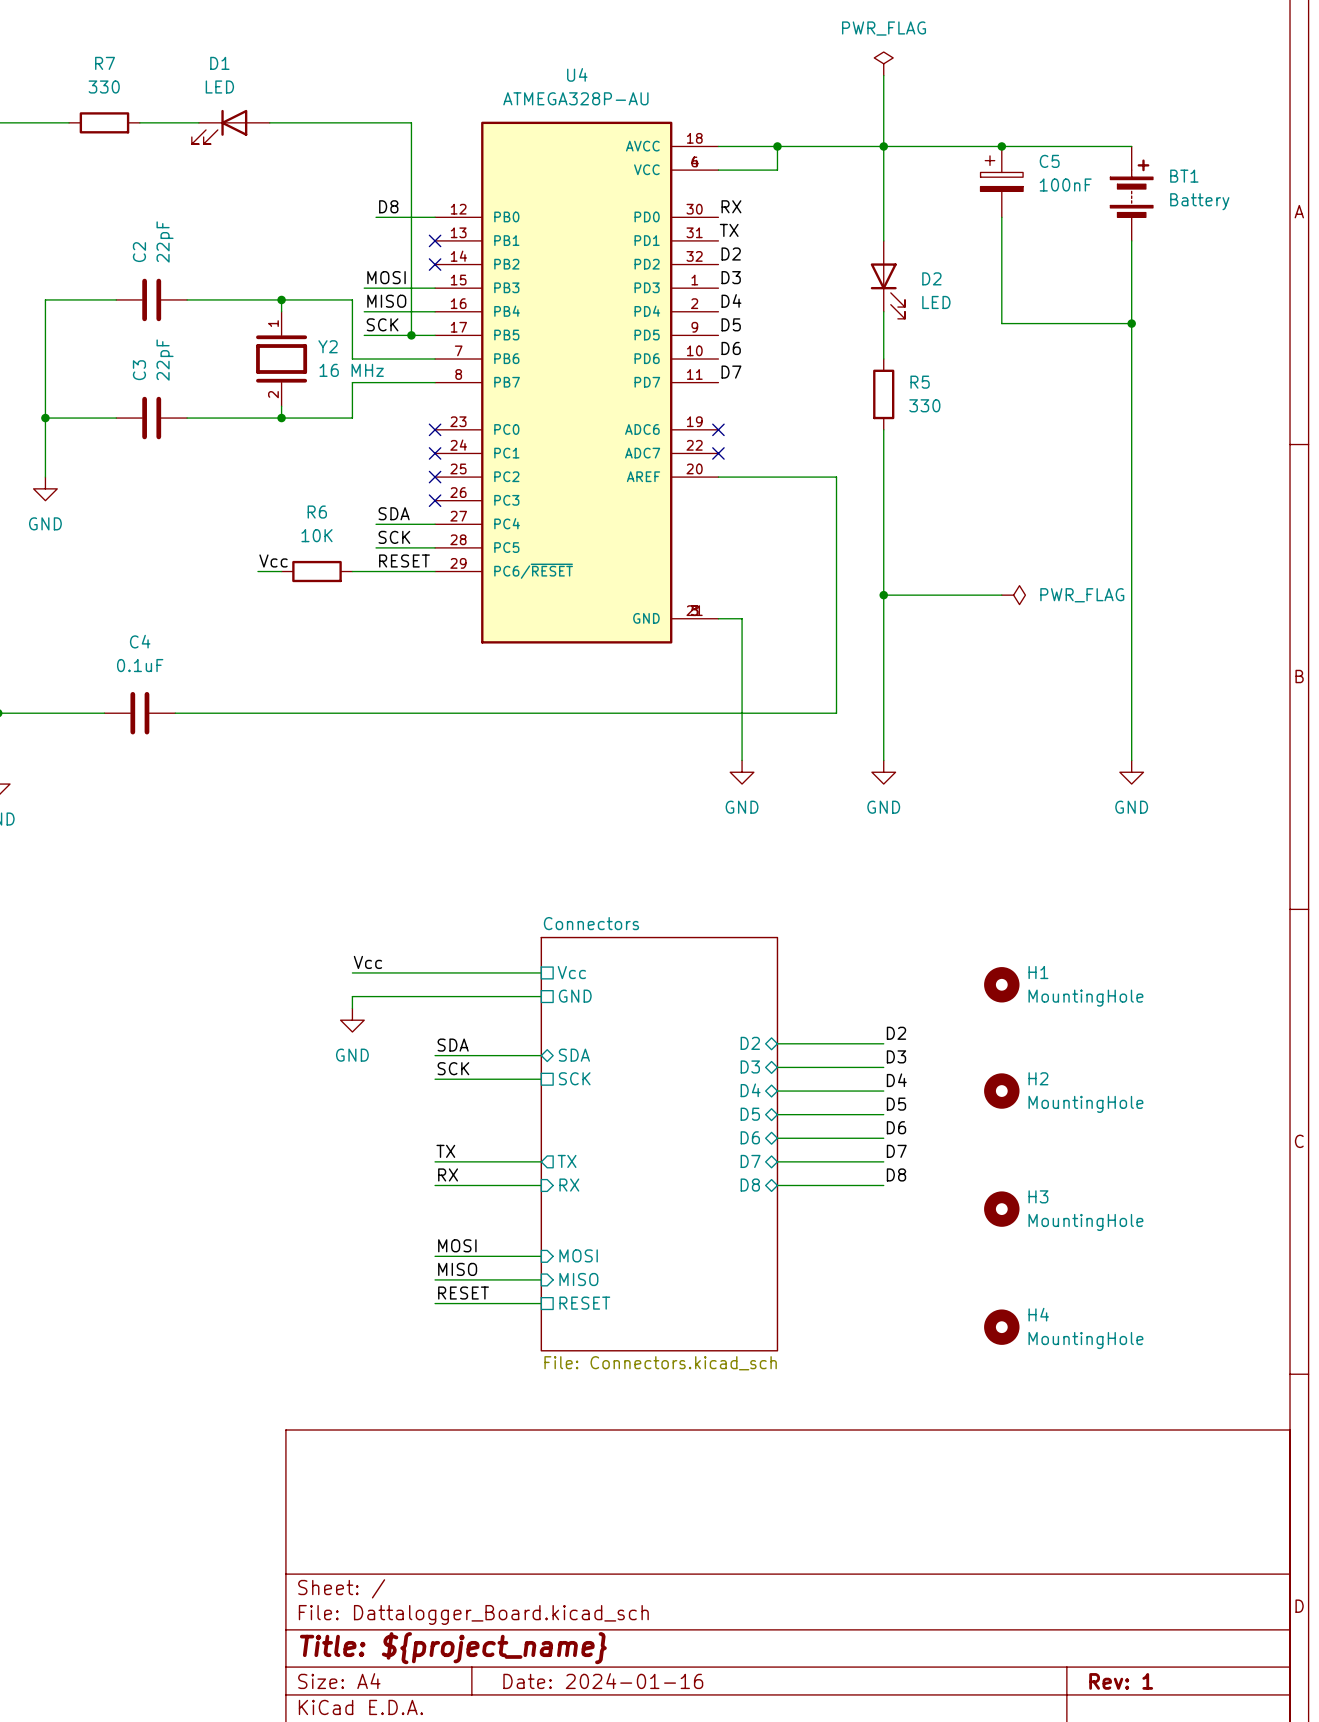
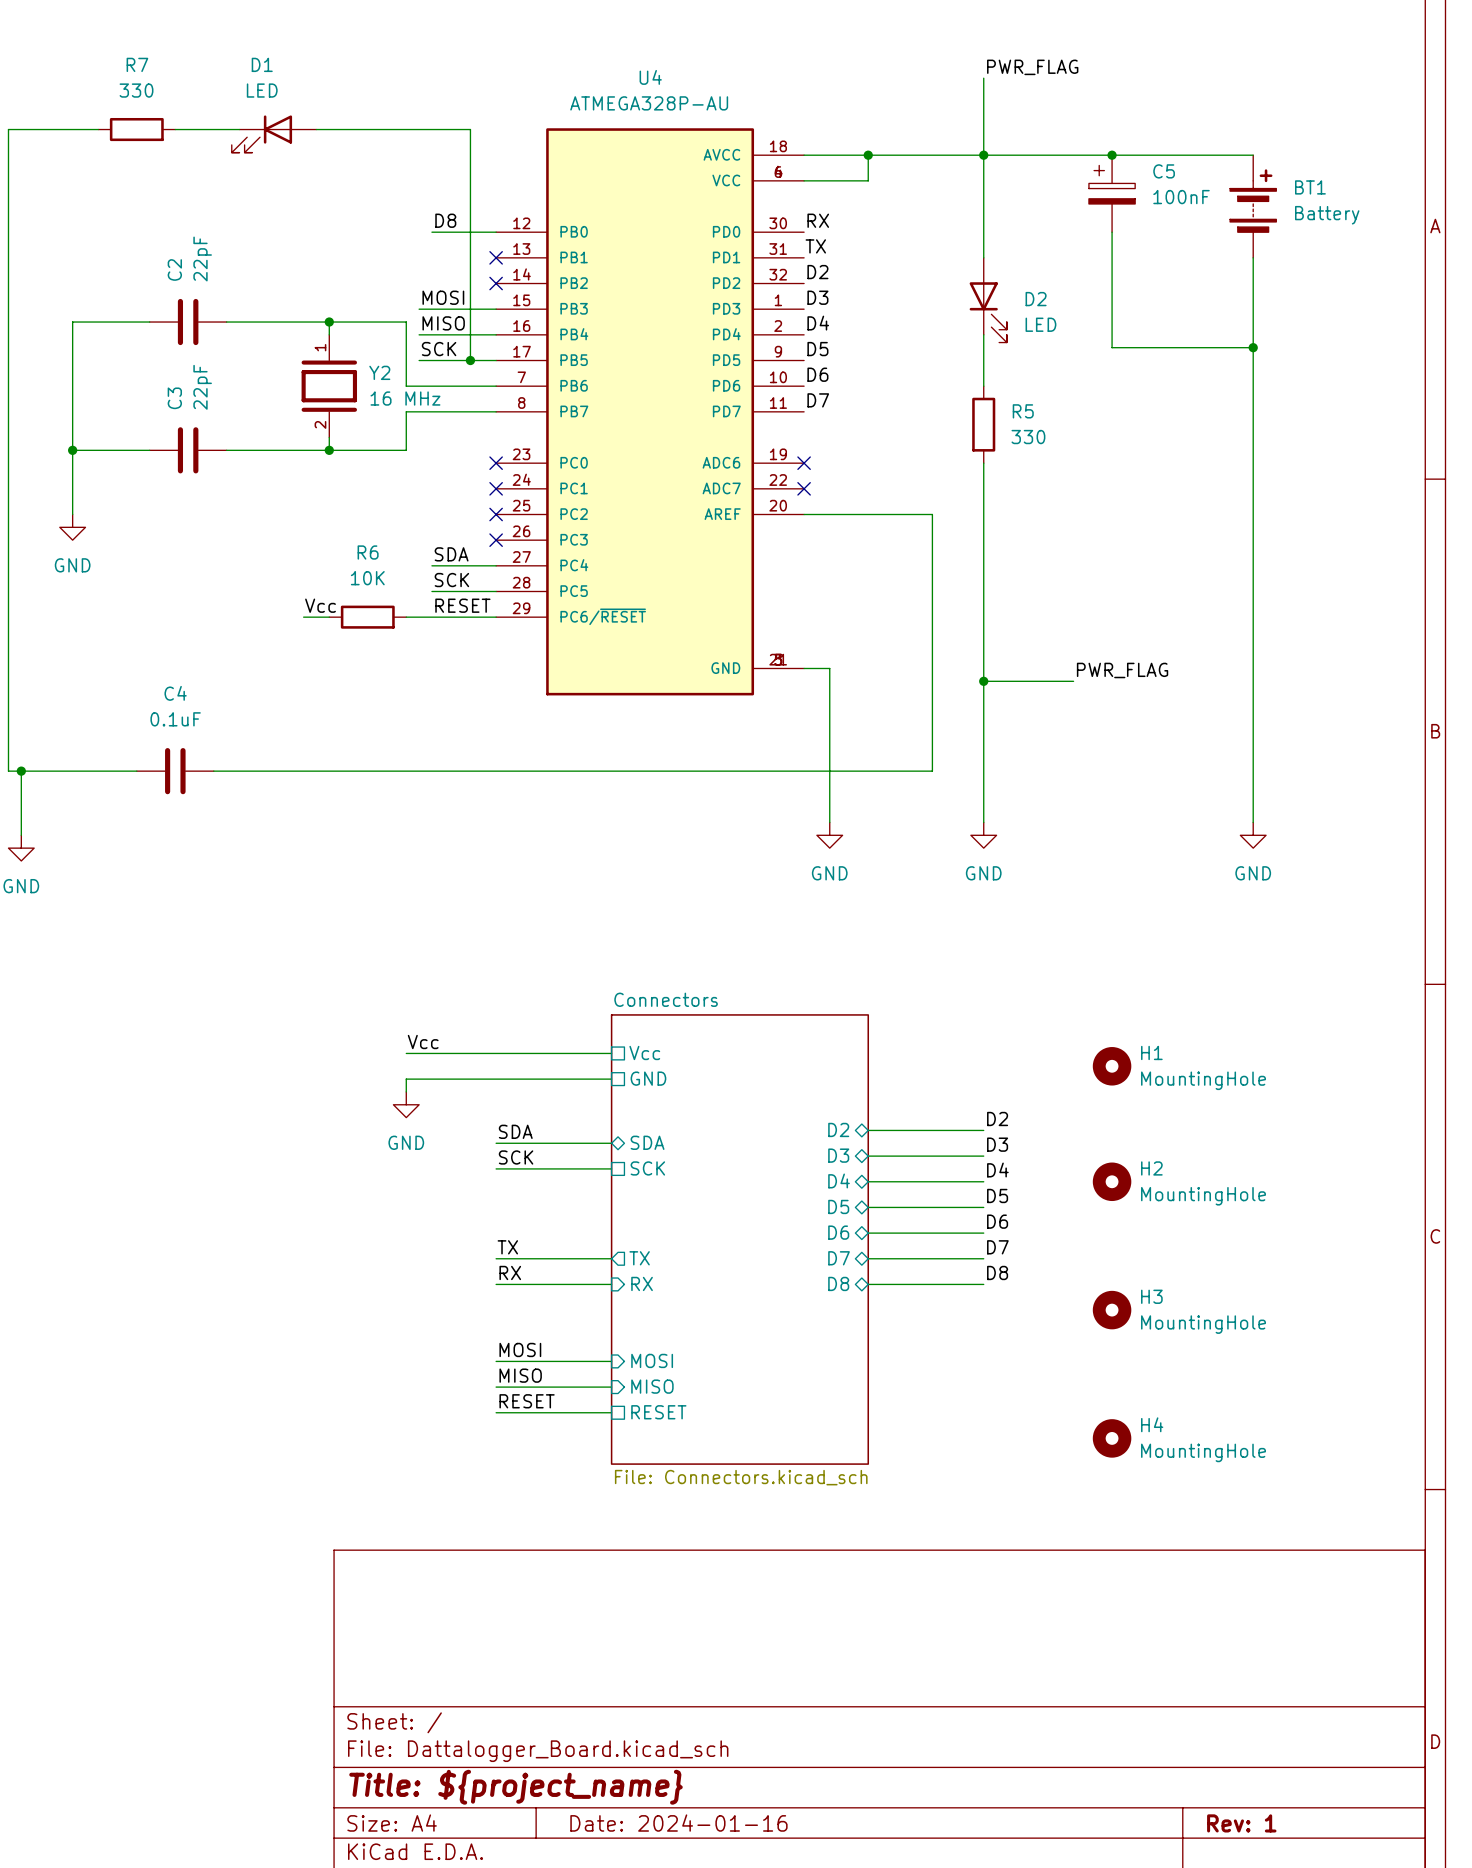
power symbol: PWR_FLAG (883, 63) -> none
label: none -> PWR_FLAG (1032, 67)
wire: (883, 595) (1001, 595) -> none
junction position: (883, 595) -> (983, 681)
power symbol: PWR_FLAG (1013, 595) -> none
label: none -> PWR_FLAG (1122, 670)
wire: none -> (983, 681) (1073, 681)

